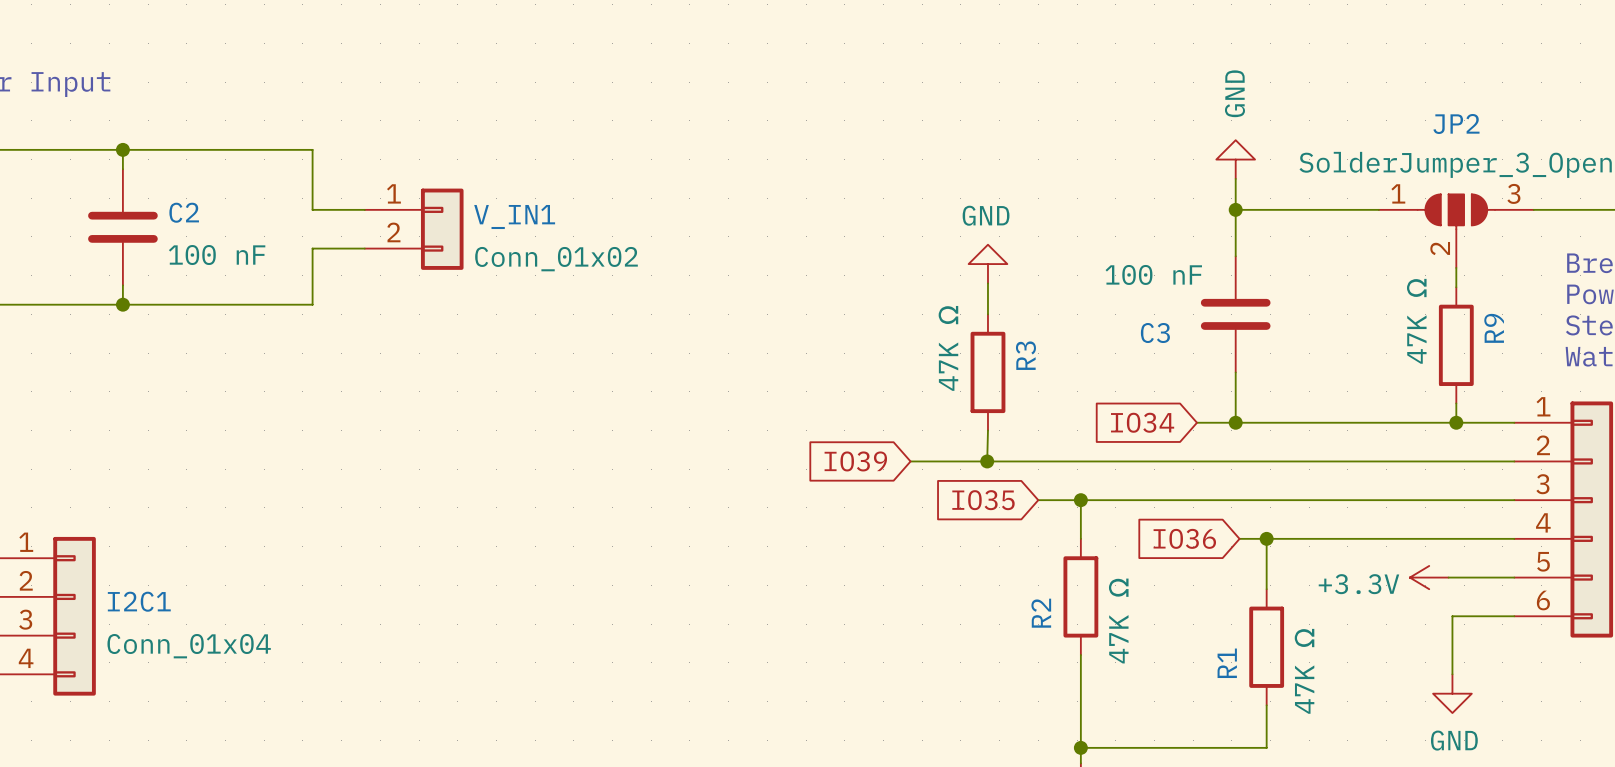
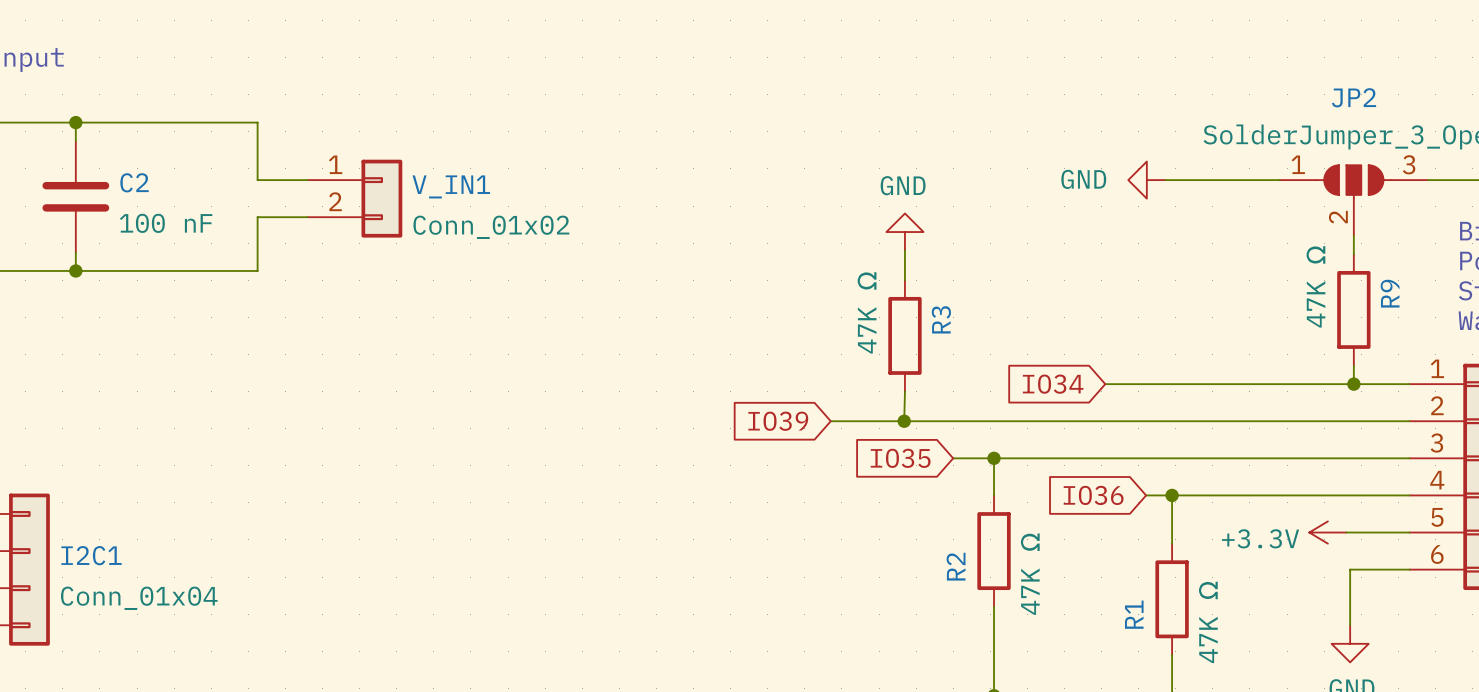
power symbol rotation: 0° (1235, 159) -> 90° counterclockwise (1146, 180)
power symbol position: GND (1235, 159) -> GND (1146, 180)
wire: (1235, 178) (1235, 256) -> none
junction: (1235, 209) -> none
C3: 100 nF (1235, 314) -> none
wire: (1235, 372) (1235, 422) -> none
junction: (1235, 422) -> none

